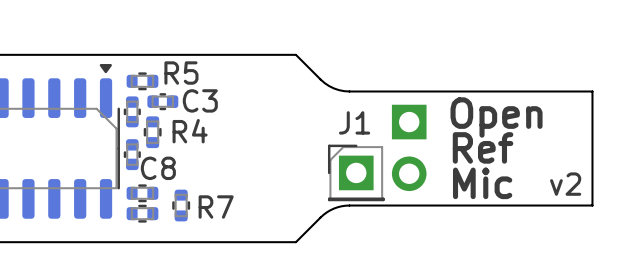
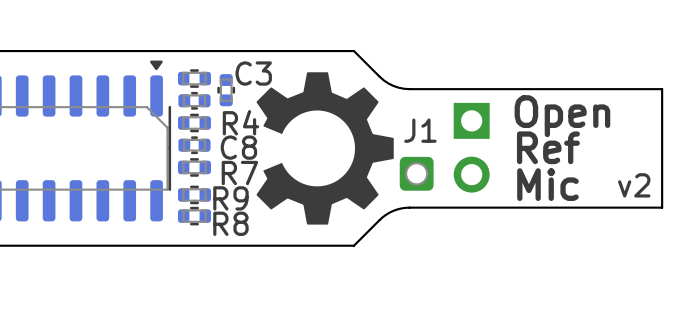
R5 name: R5 (181, 73) -> none
drawing: none -> [256, 72, 394, 225]
C3 rotation: 0° (162, 101) -> 90° clockwise (226, 90)
part rotation: 0° (132, 111) -> 90° clockwise (194, 100)
R4 rotation: 0° (152, 132) -> 90° clockwise (194, 122)
J1 footprint: [327, 144, 385, 202] -> [399, 156, 434, 191]
C8 rotation: 0° (132, 154) -> 90° clockwise (194, 145)
R9 name: none -> R9 (230, 198)
R7 rotation: 0° (181, 205) -> 90° clockwise (194, 167)
R7 position: (181, 205) -> (194, 167)
R8 name: none -> R8 (230, 223)

